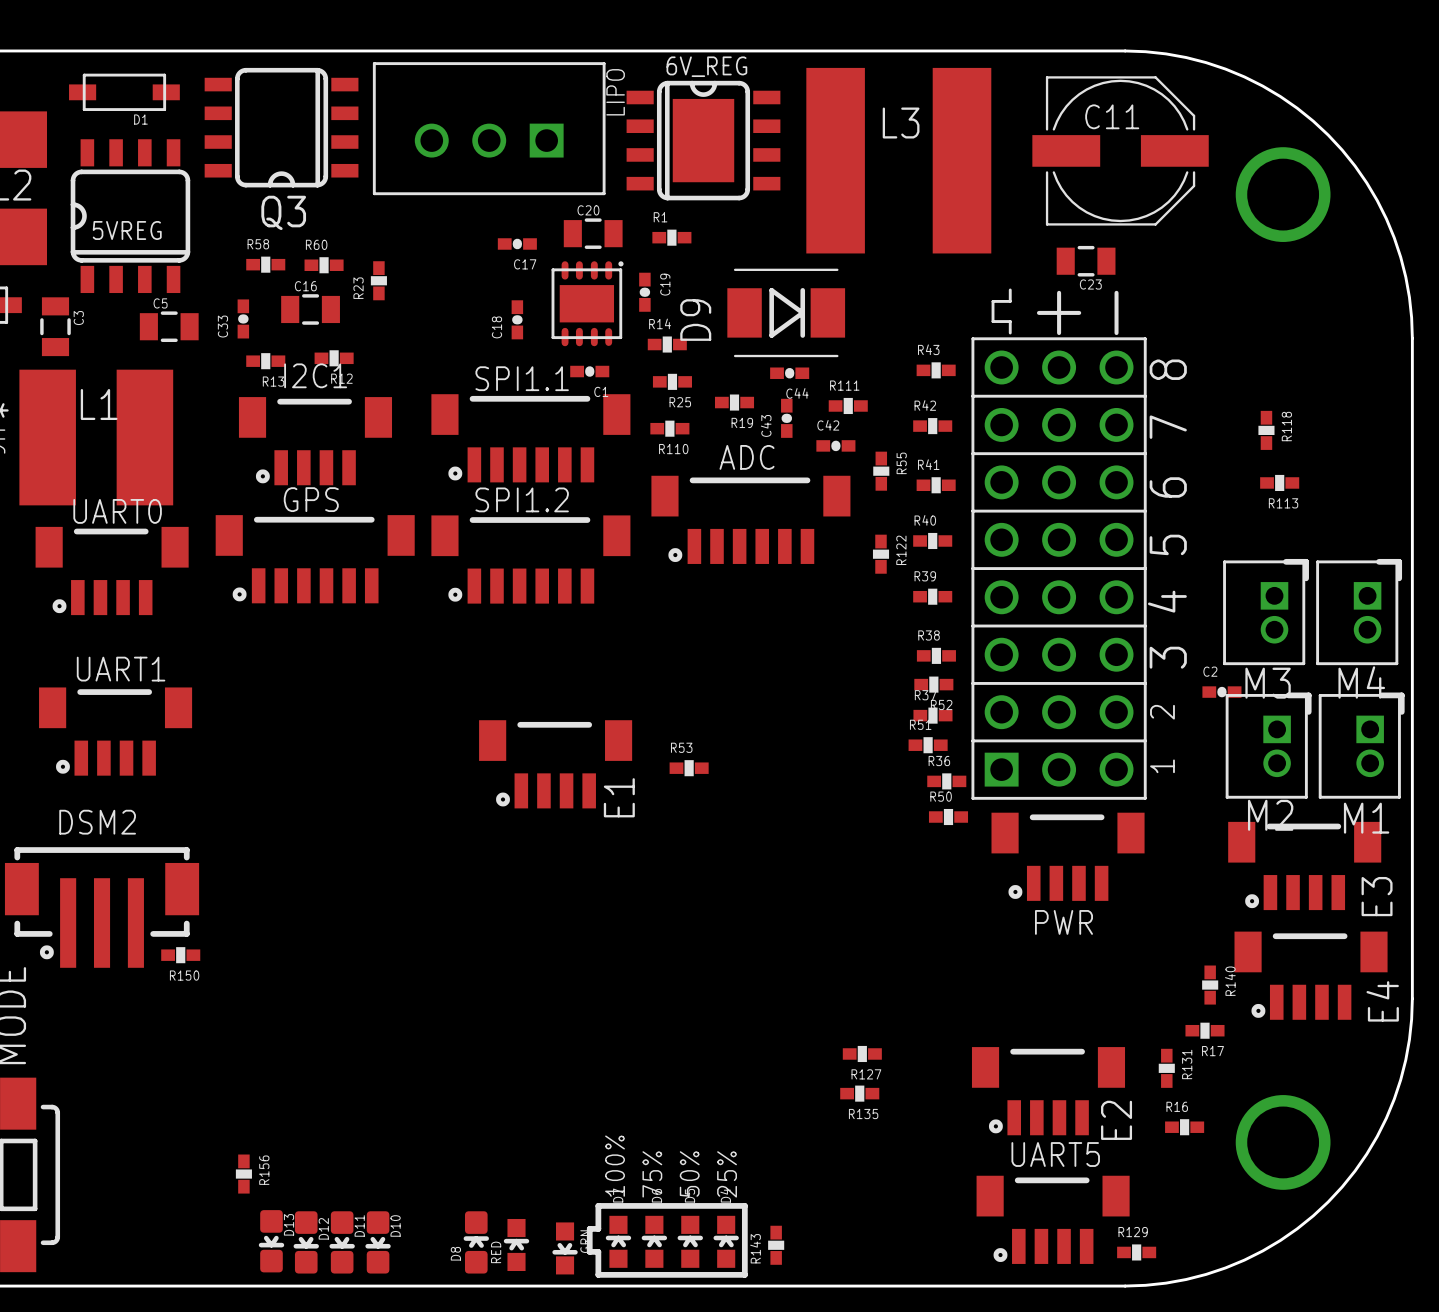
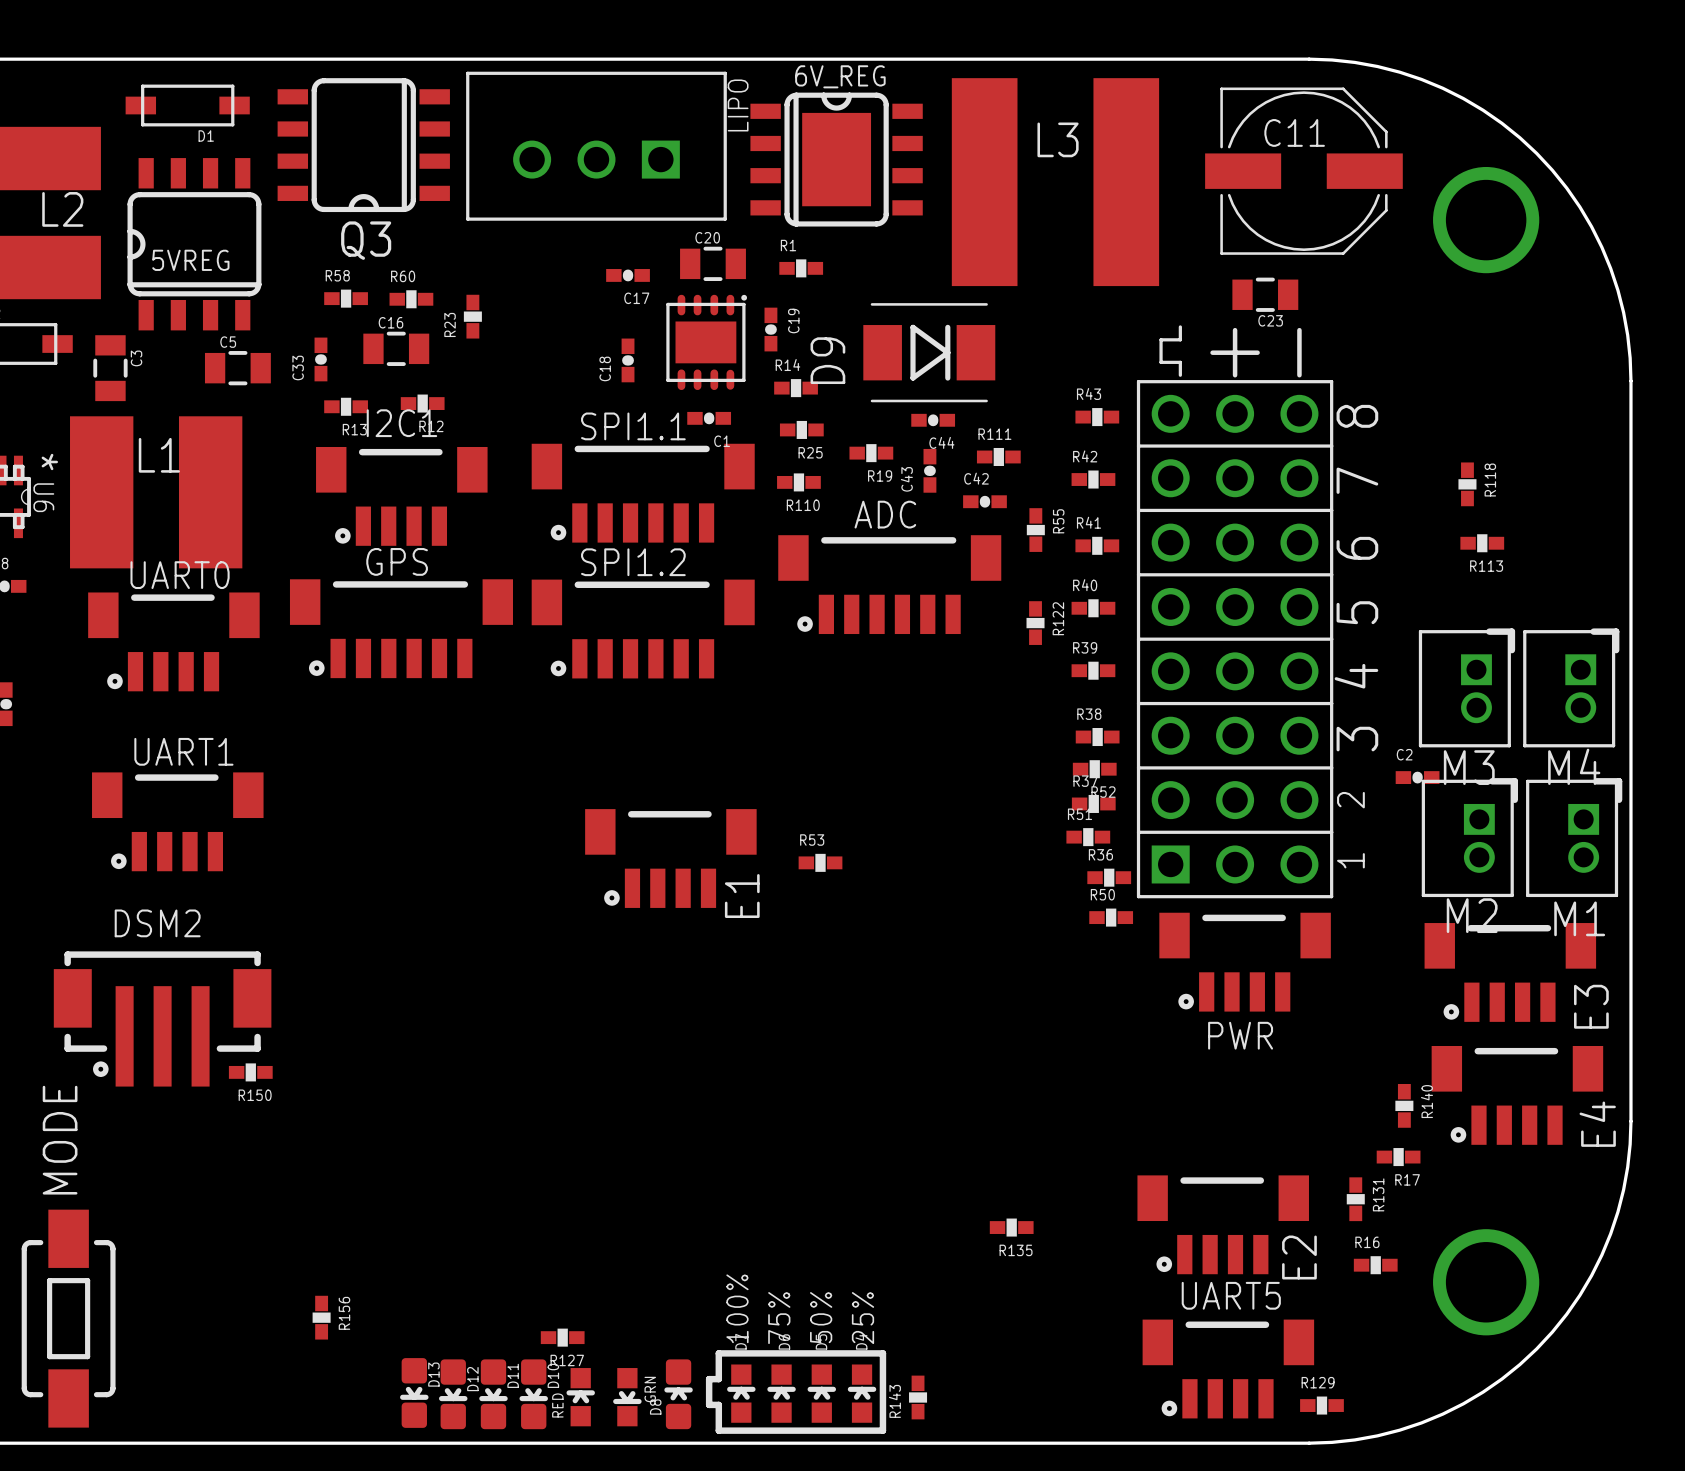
R127 position: (862, 1053) -> (562, 1337)
D13 position: (271, 1241) -> (414, 1392)
D12 position: (306, 1242) -> (453, 1394)
D11 position: (342, 1242) -> (493, 1394)
D10 position: (378, 1242) -> (533, 1394)
D8 position: (476, 1242) -> (678, 1394)
RED position: (516, 1244) -> (580, 1397)
GRN position: (565, 1248) -> (627, 1397)

